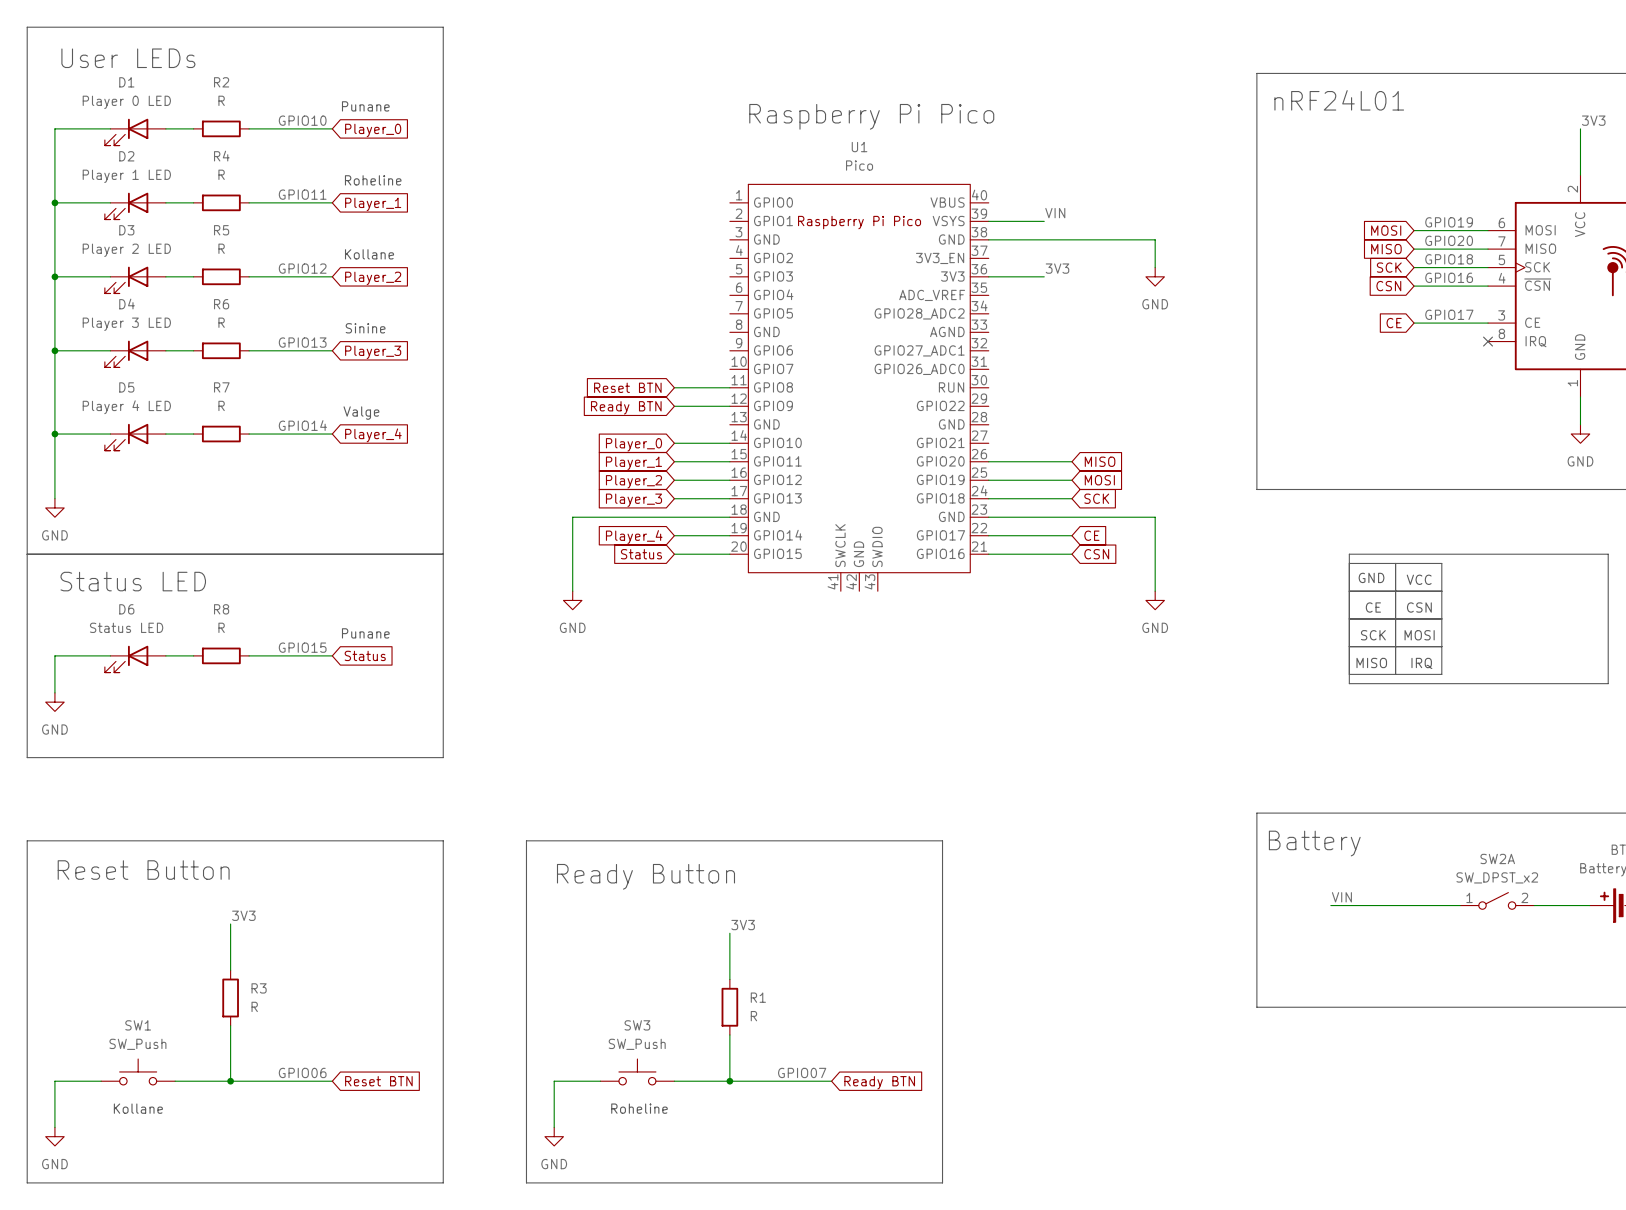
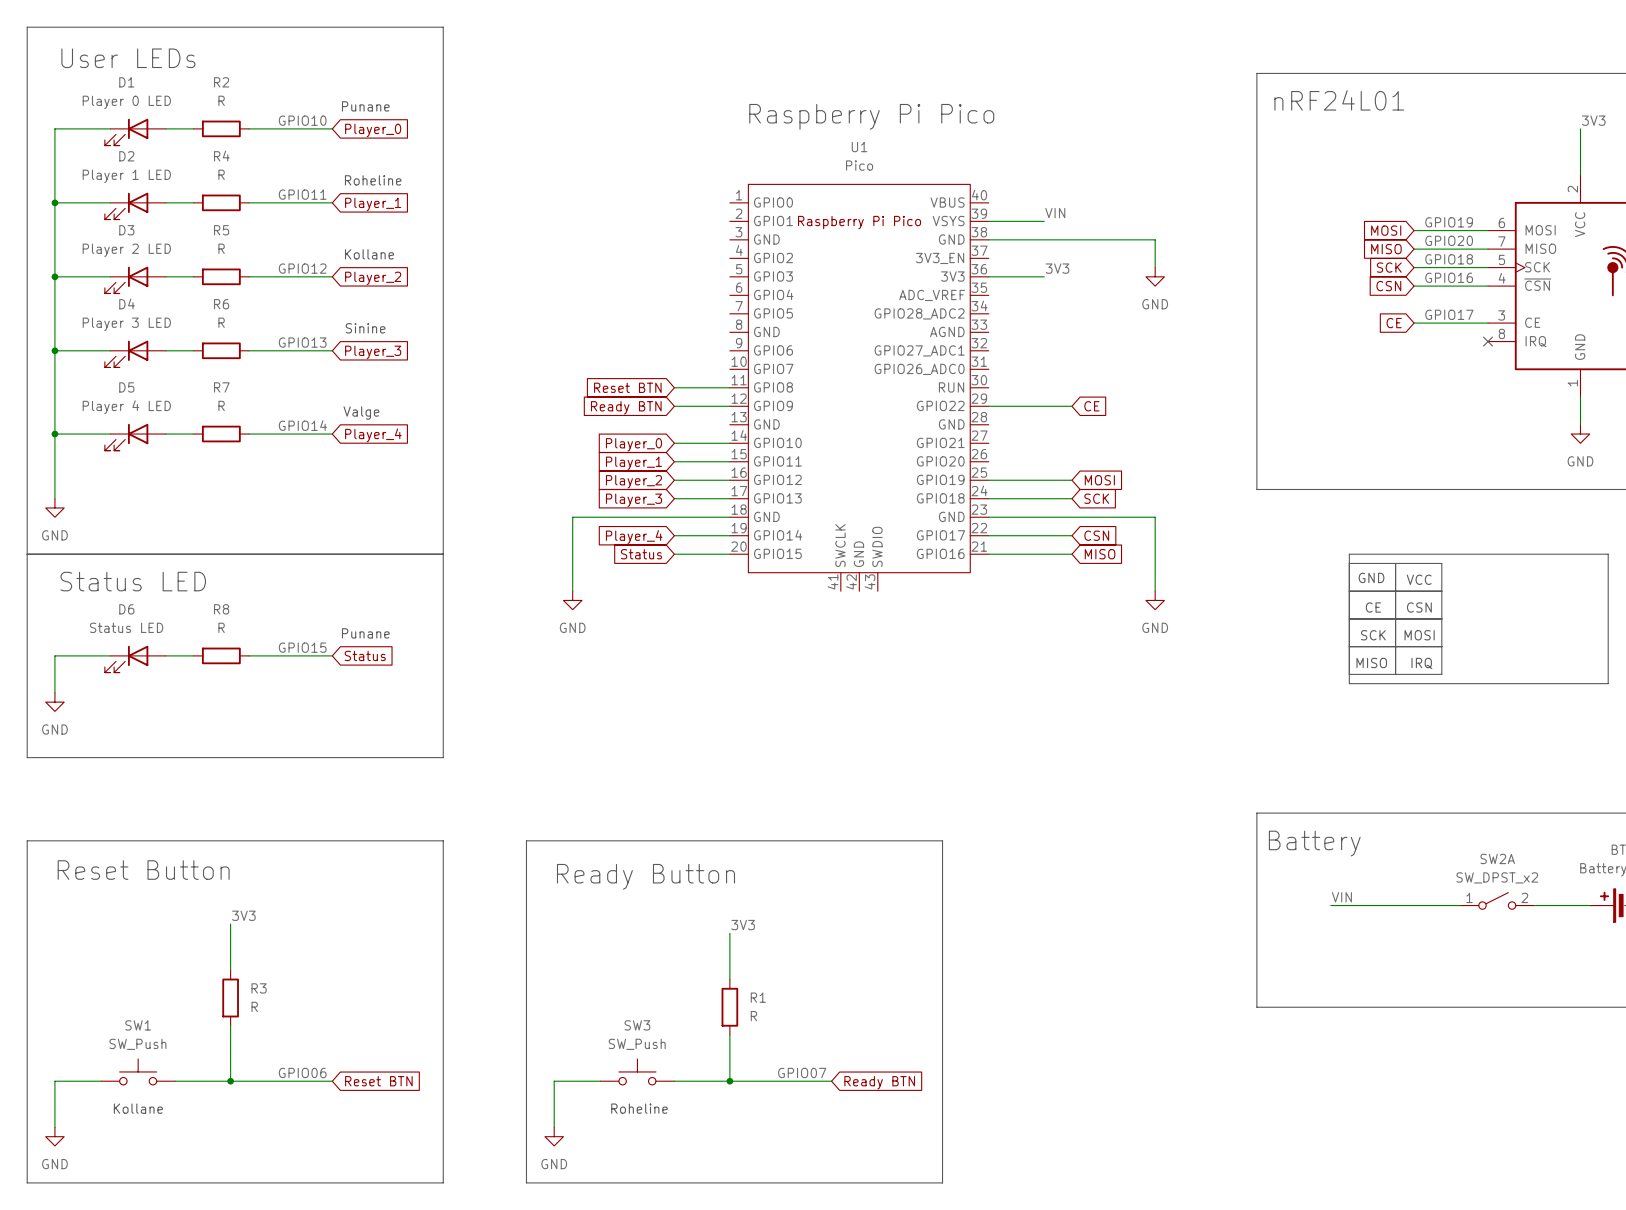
global label: none -> CE (1091, 406)
wire: (988, 461) (1071, 461) -> (988, 406) (1071, 406)
global label: MISO (1100, 461) -> none
global label: CE (1091, 535) -> CSN (1096, 535)
global label: CSN (1096, 554) -> MISO (1100, 554)

